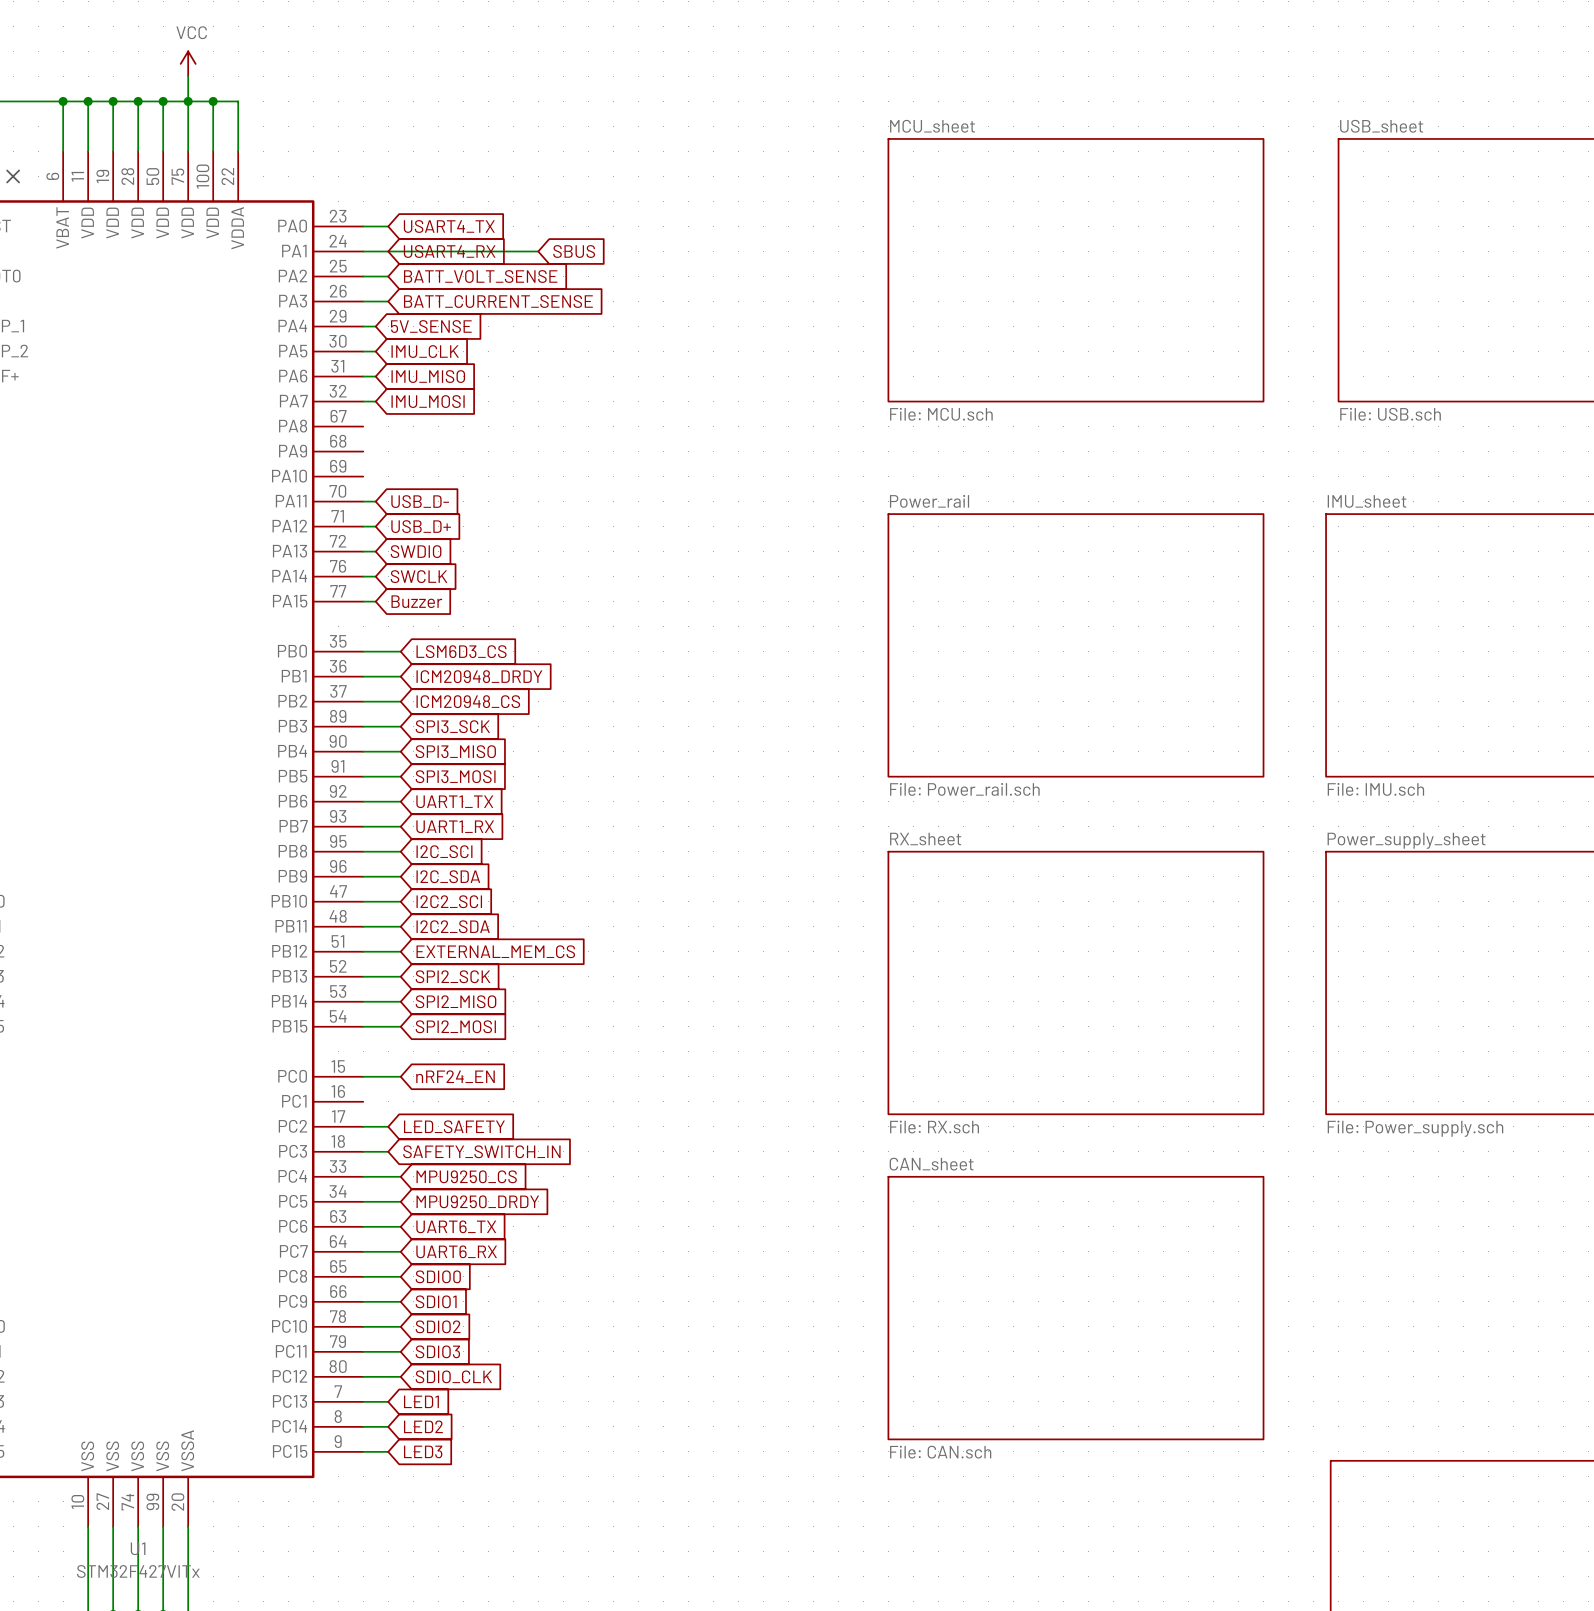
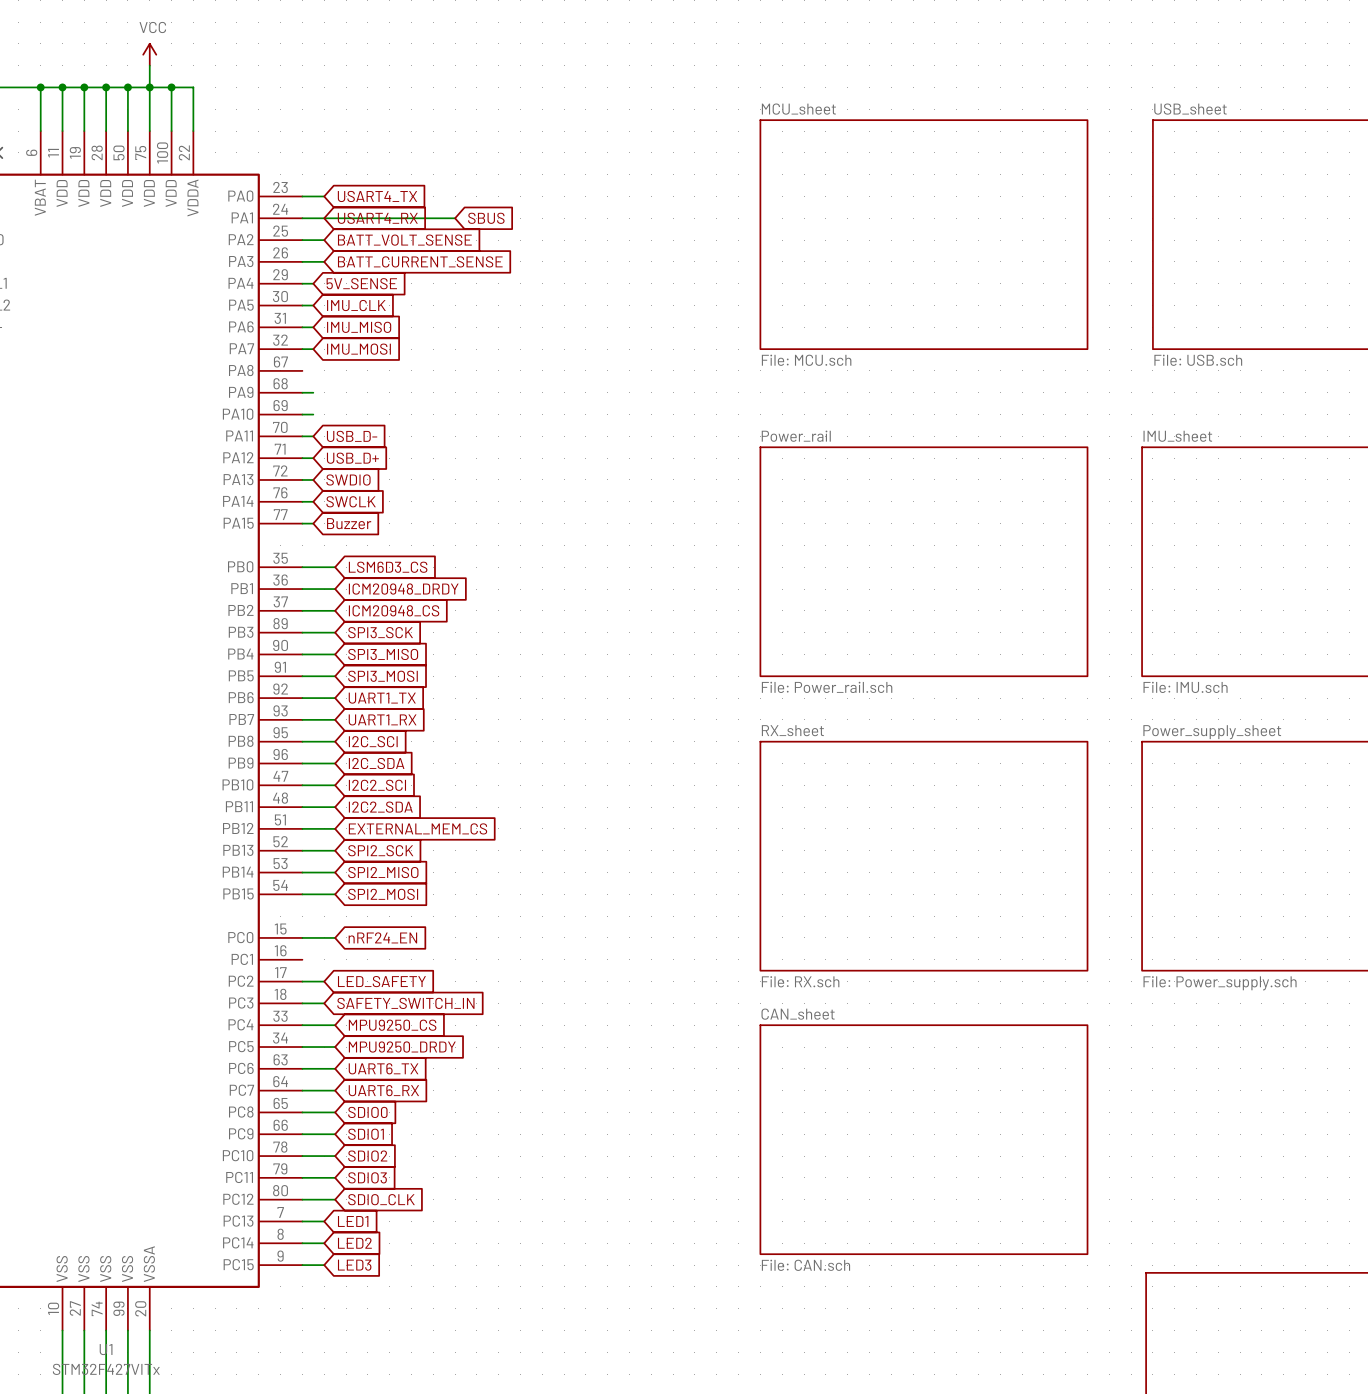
wire: none -> (302, 392) (313, 392)
wire: none -> (302, 414) (313, 414)

